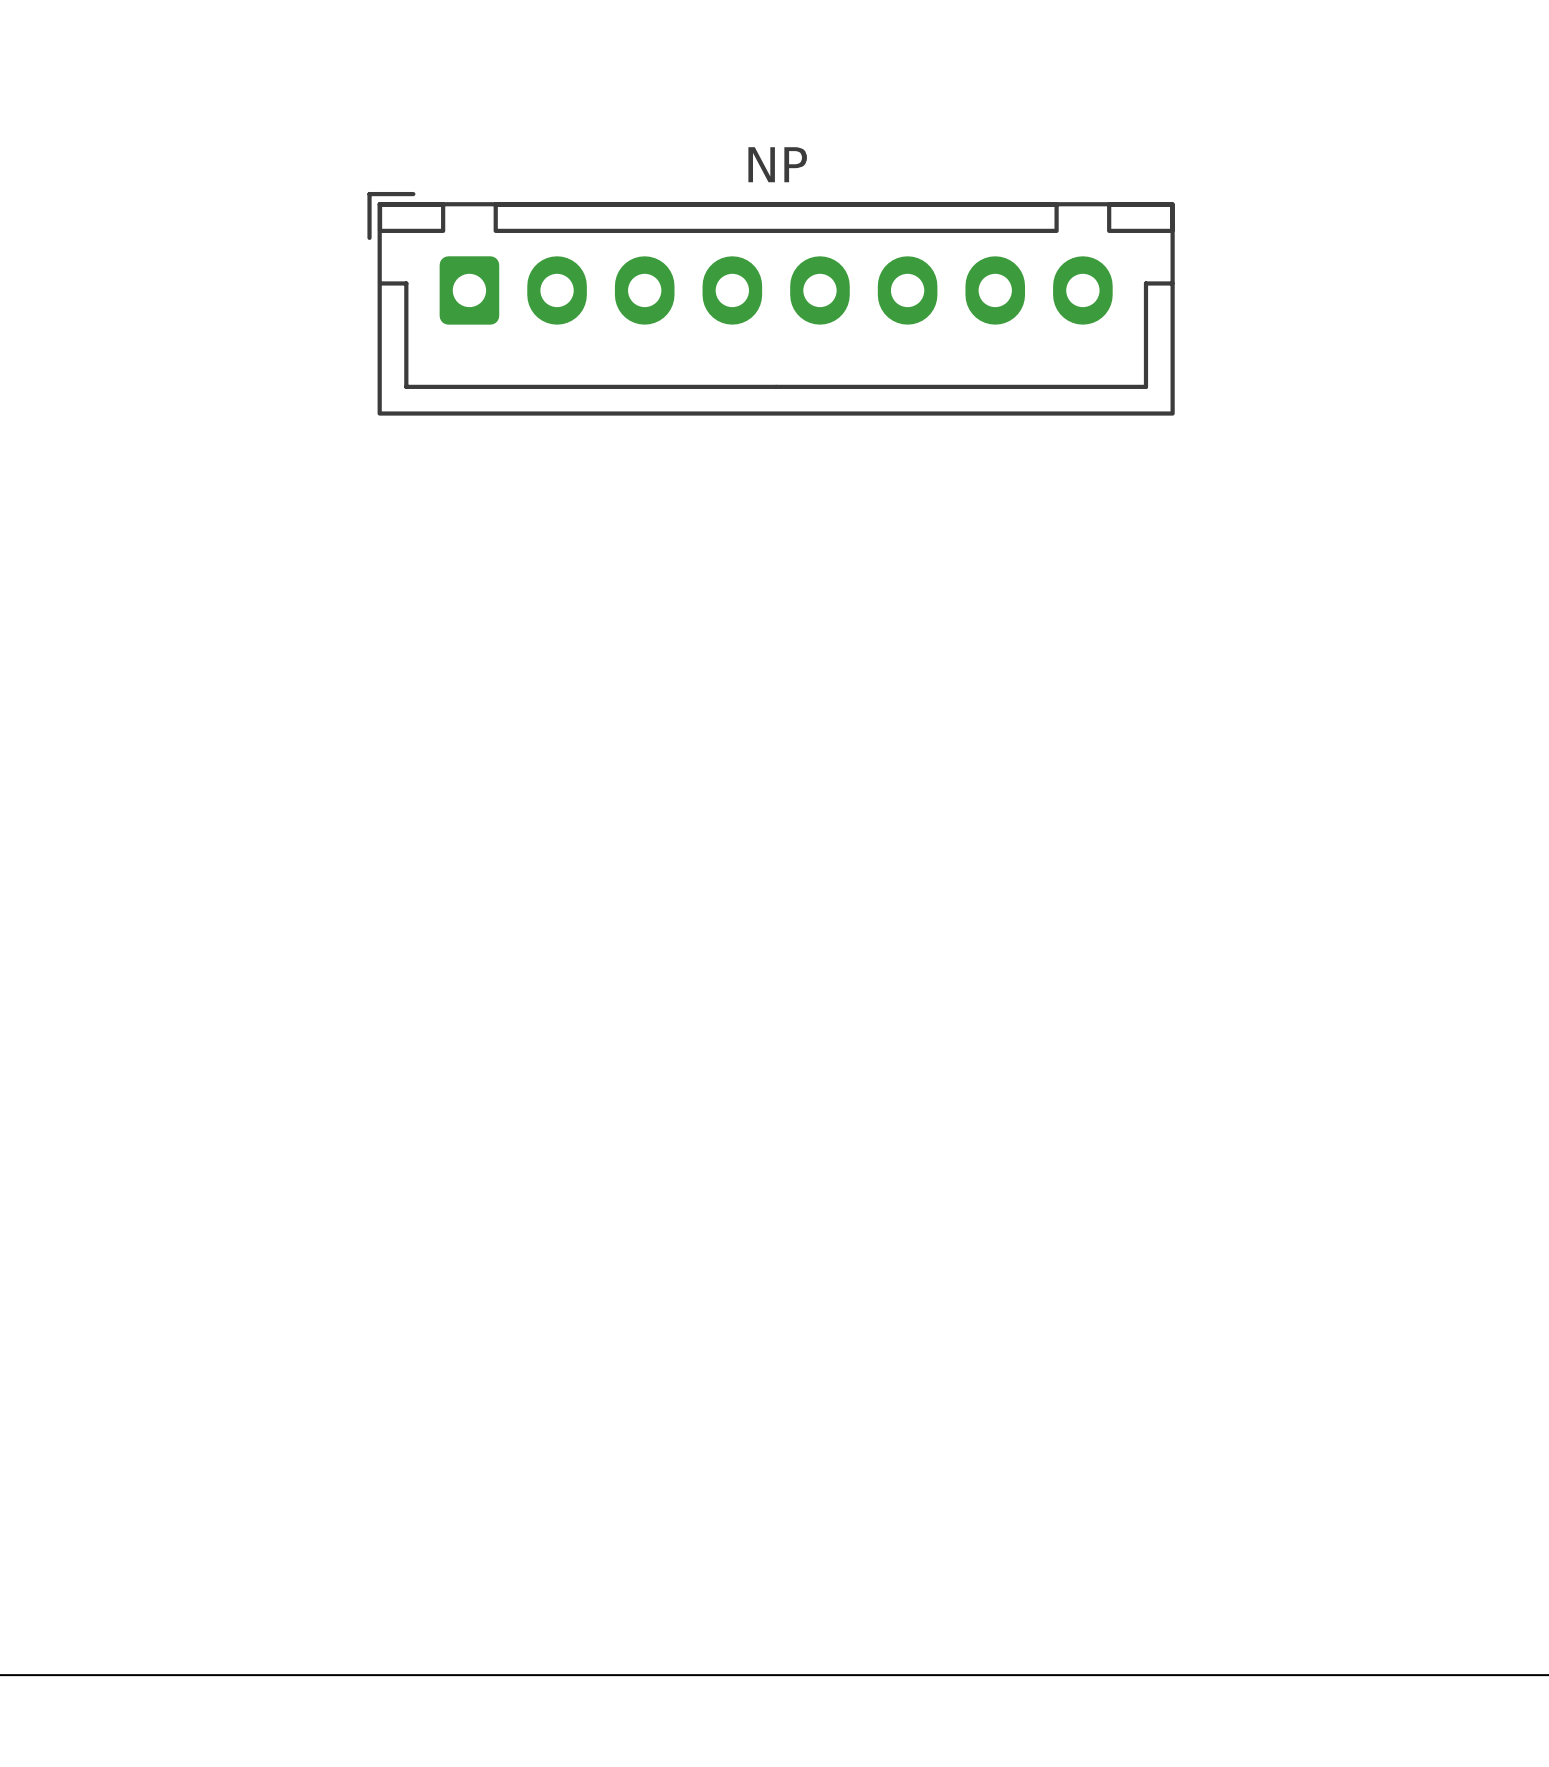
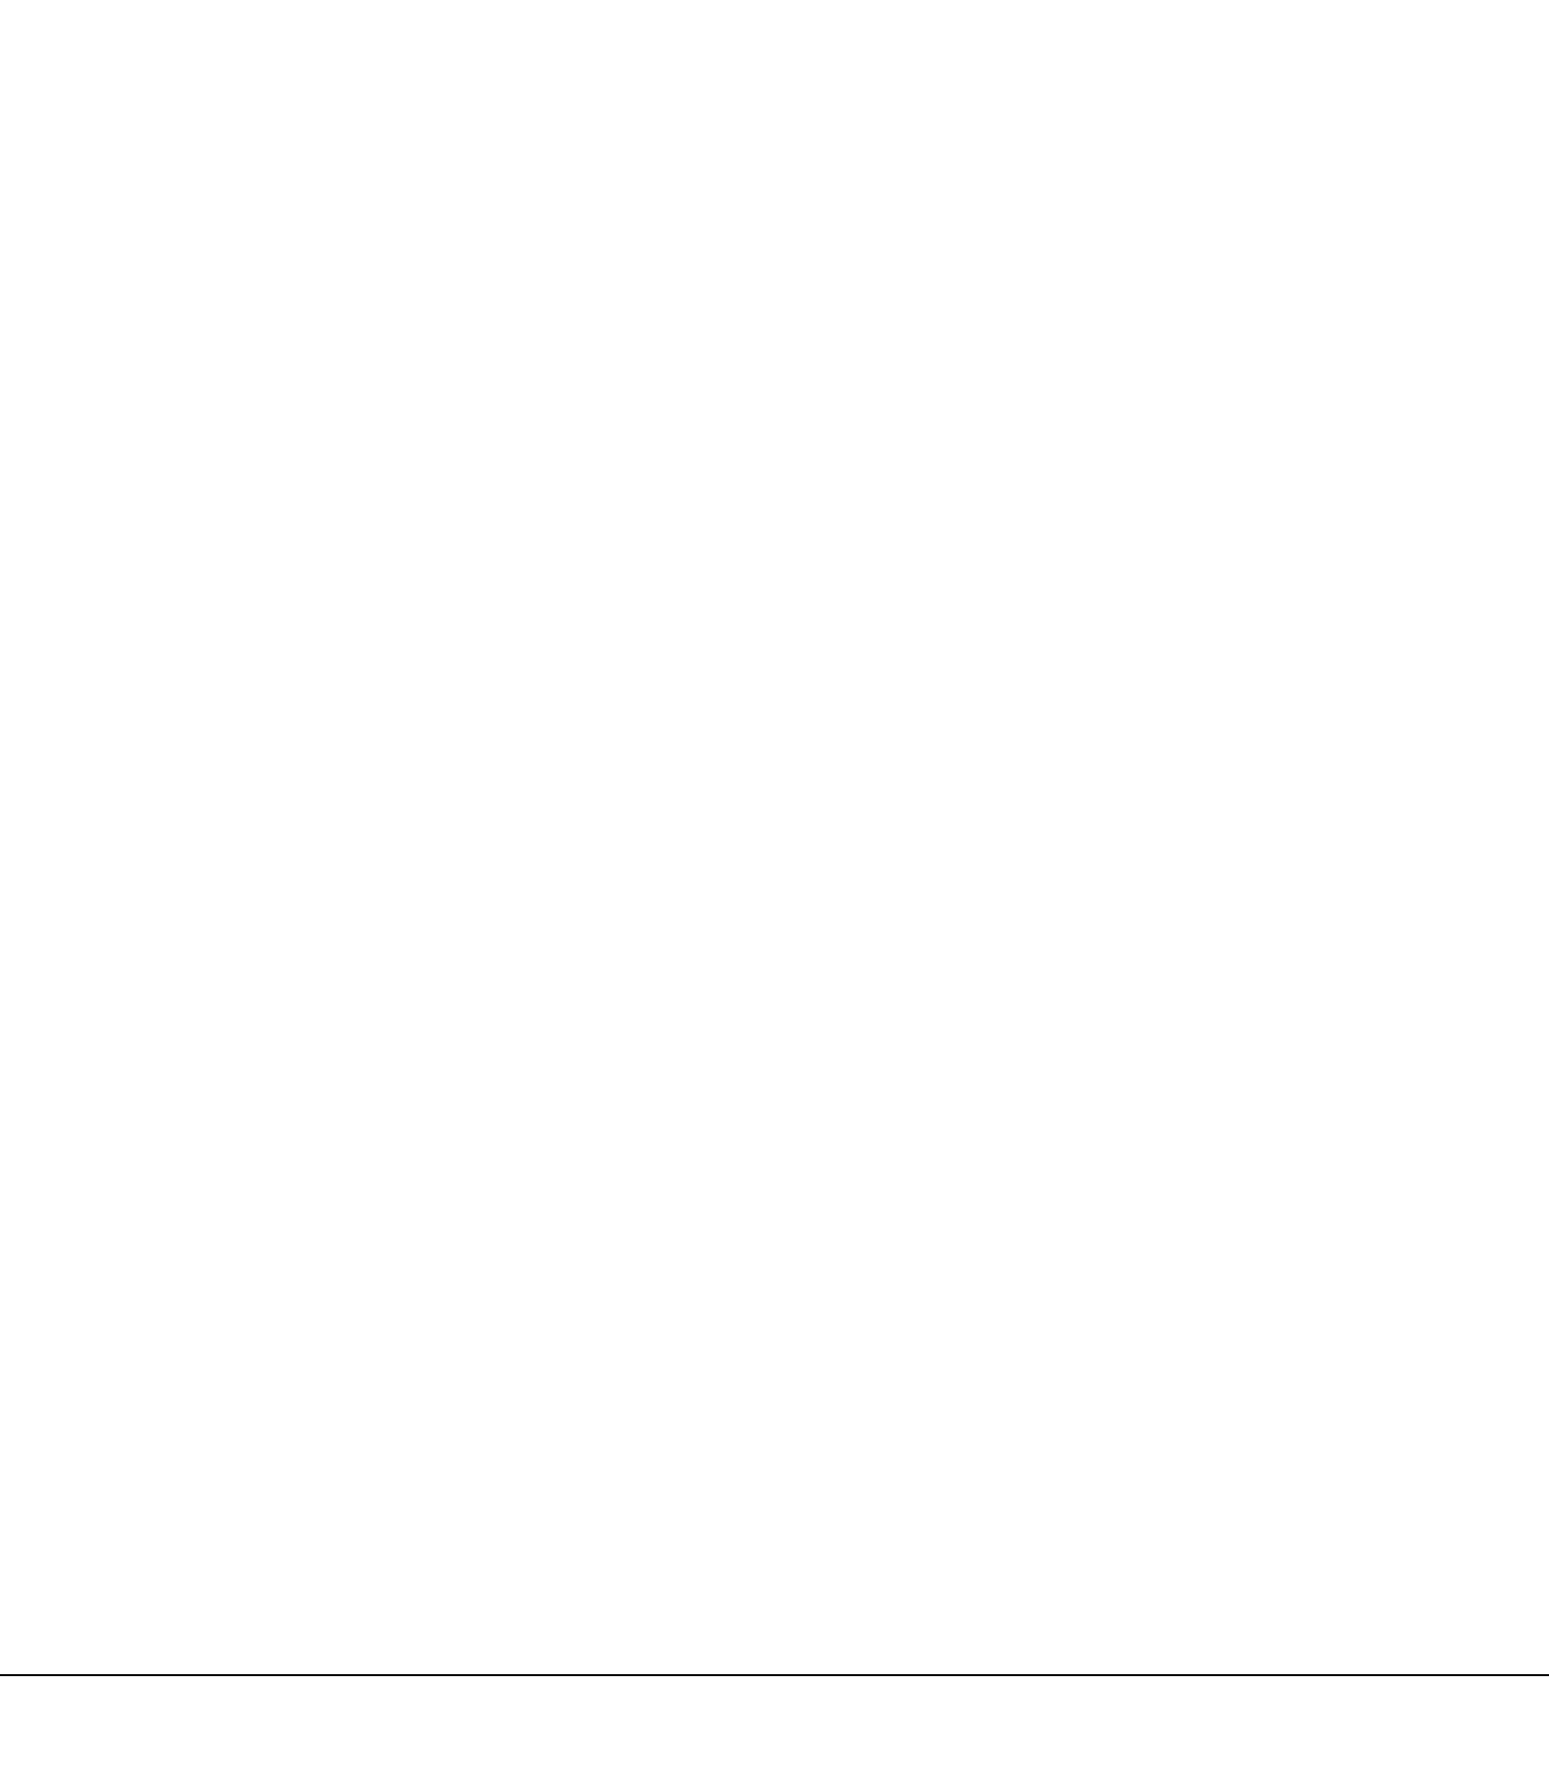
NP: (771, 303) -> none

